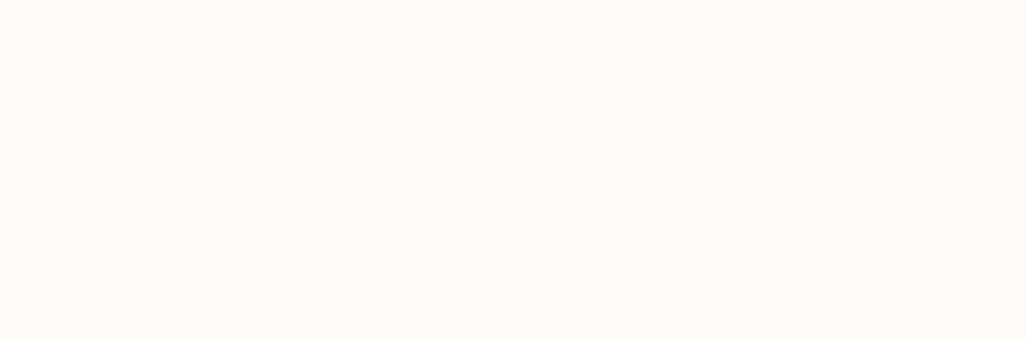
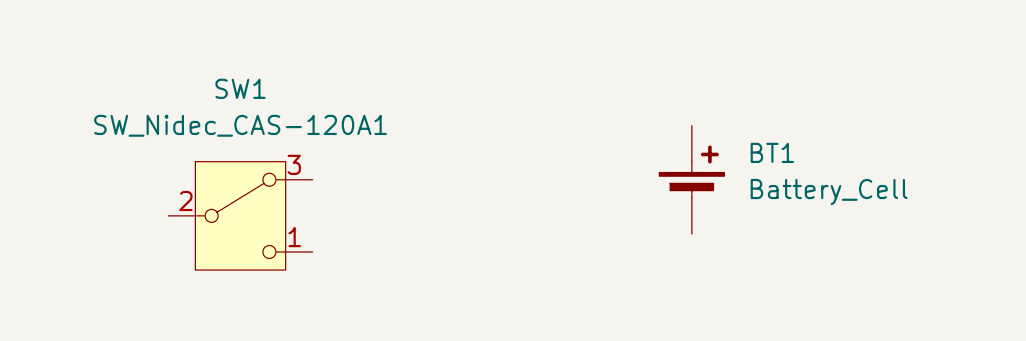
BT1: none -> Battery_Cell (691, 179)
SW1: none -> SW_Nidec_CAS-120A1 (240, 215)

